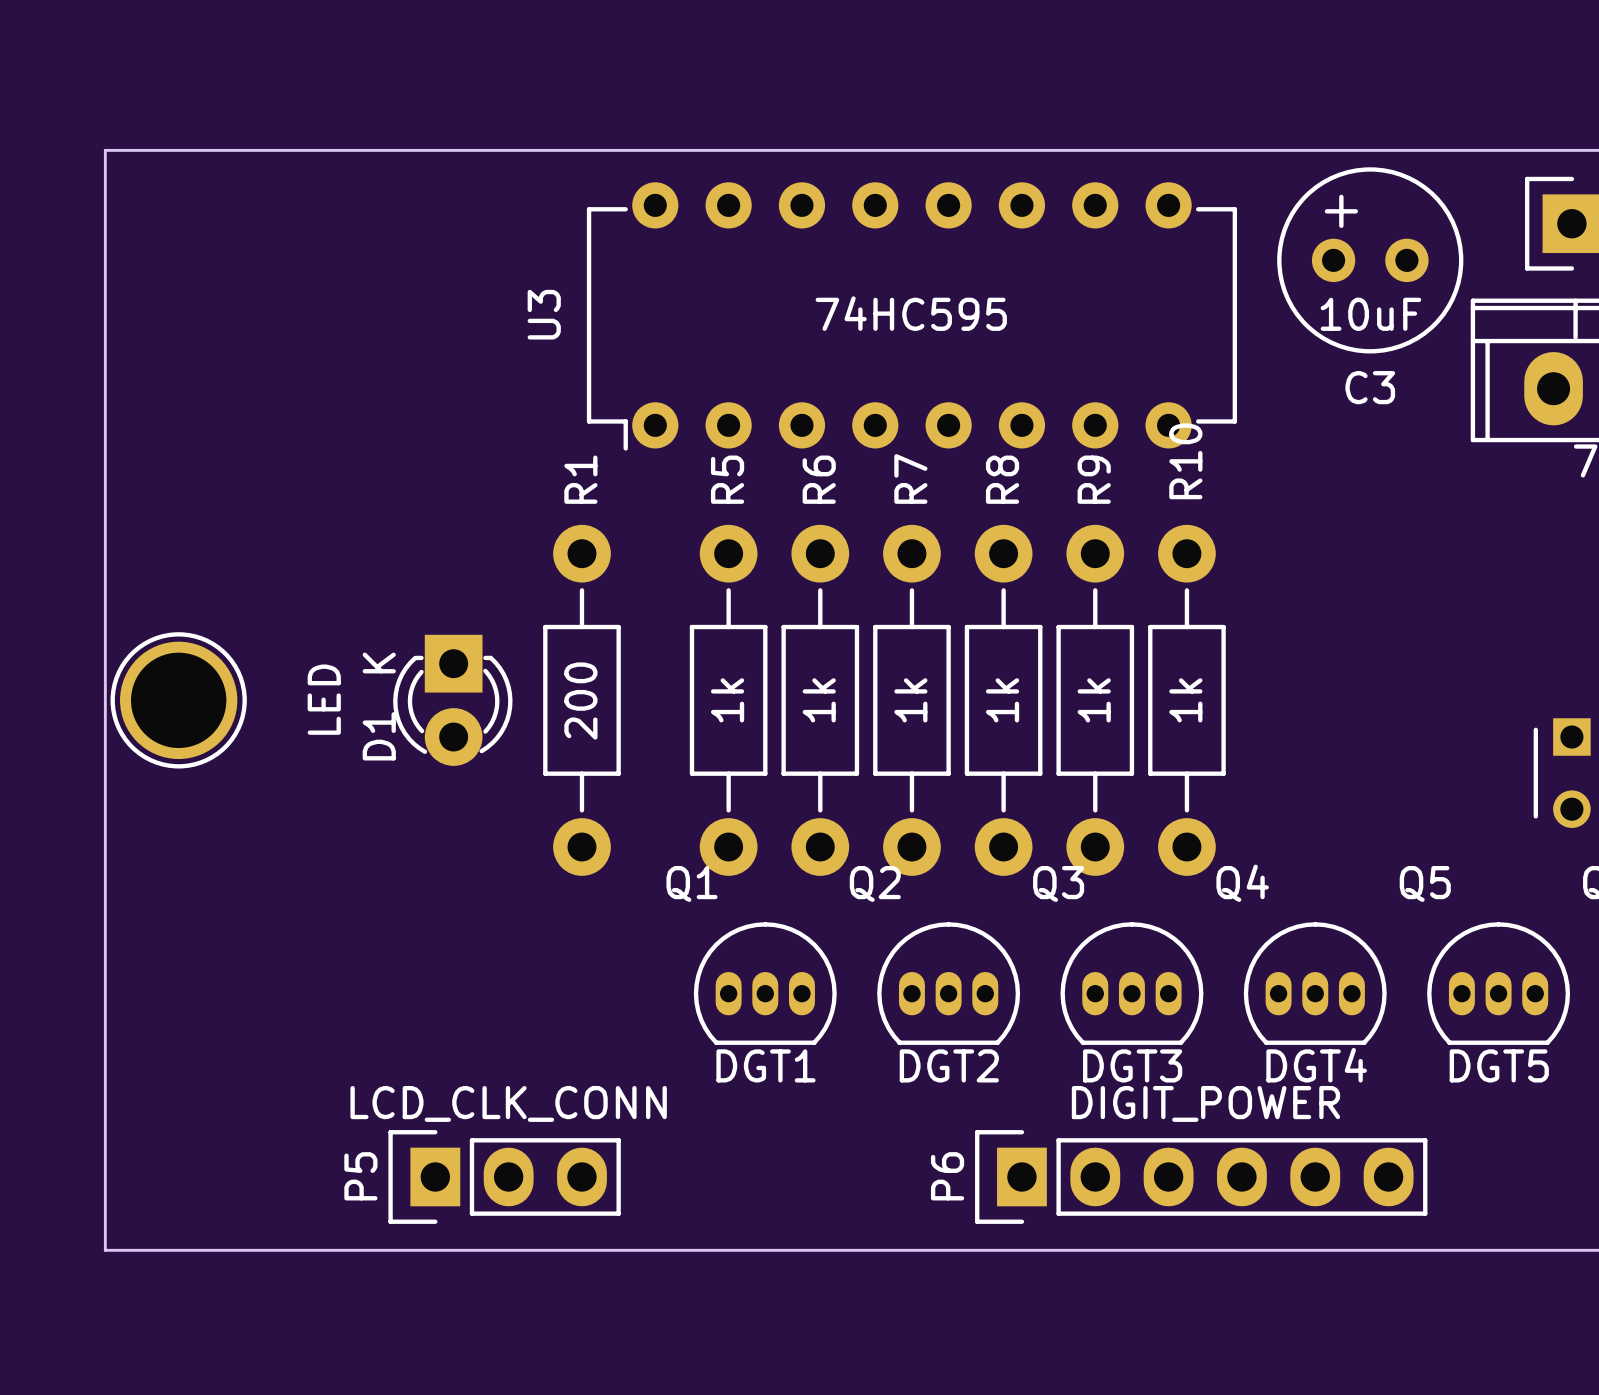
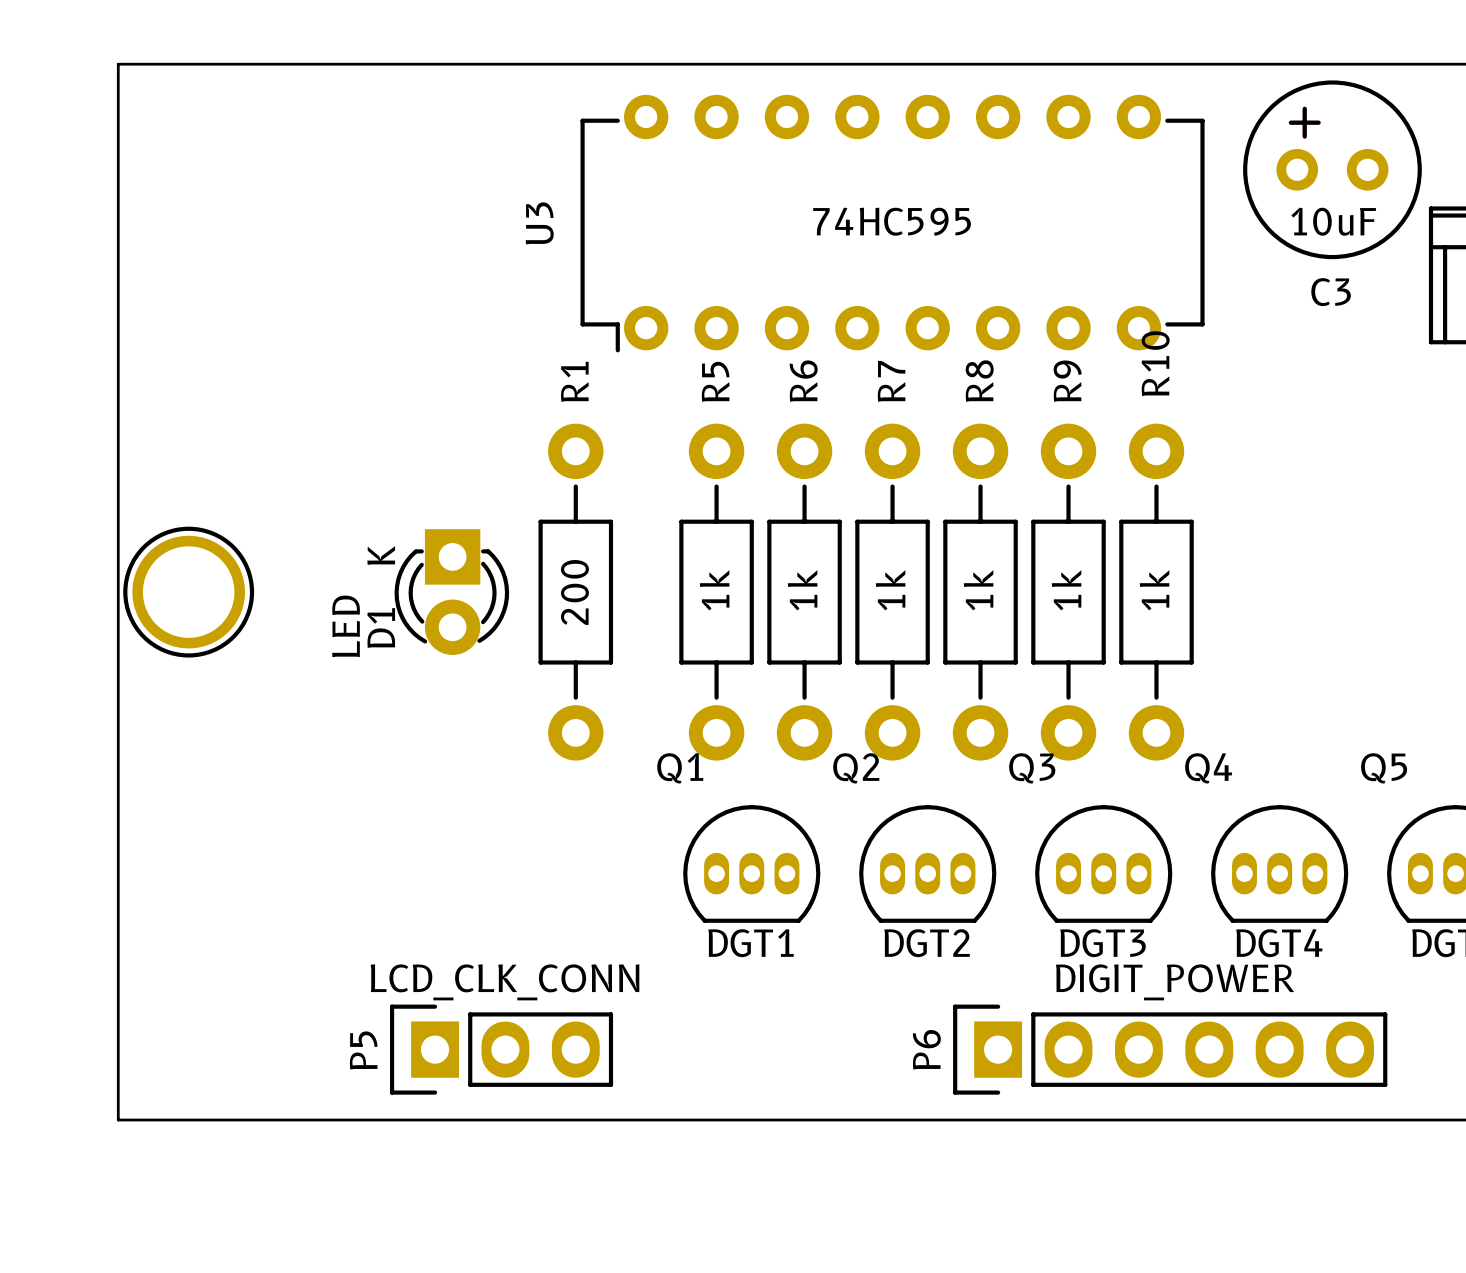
D1 value position: LED (324, 699) -> LED (346, 626)

